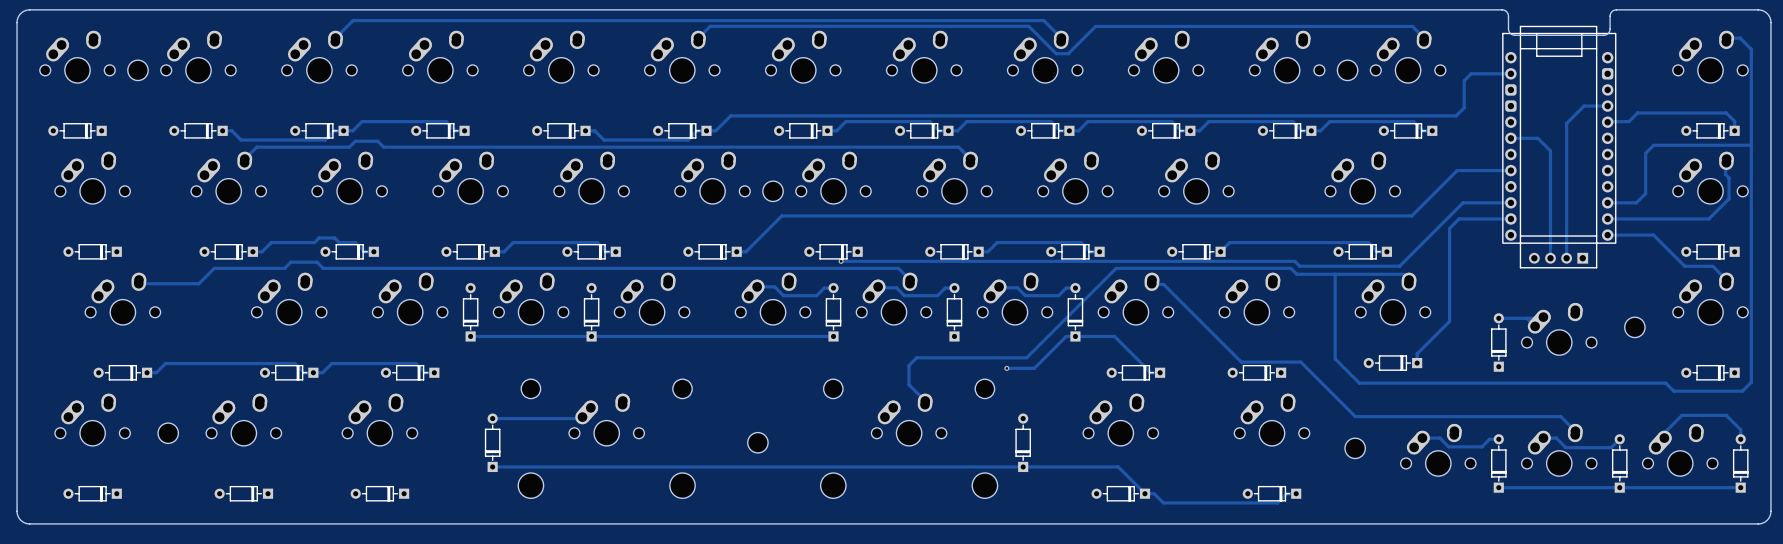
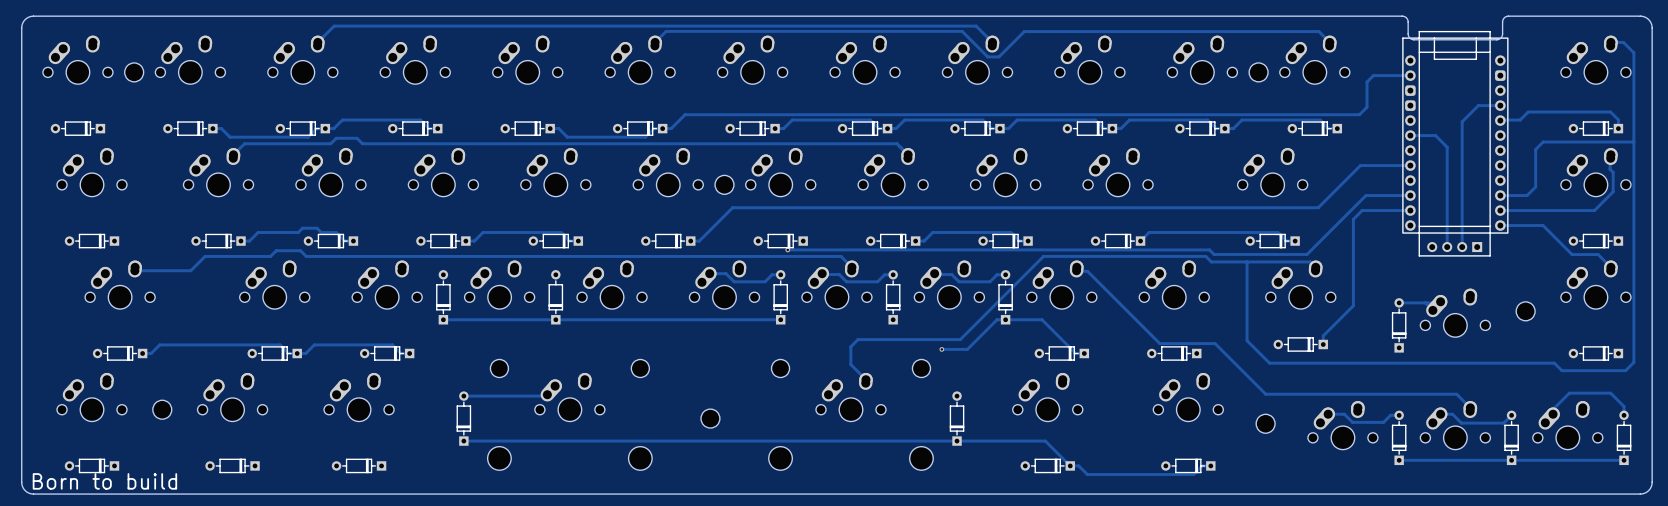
text: none -> Born to build (104, 481)

